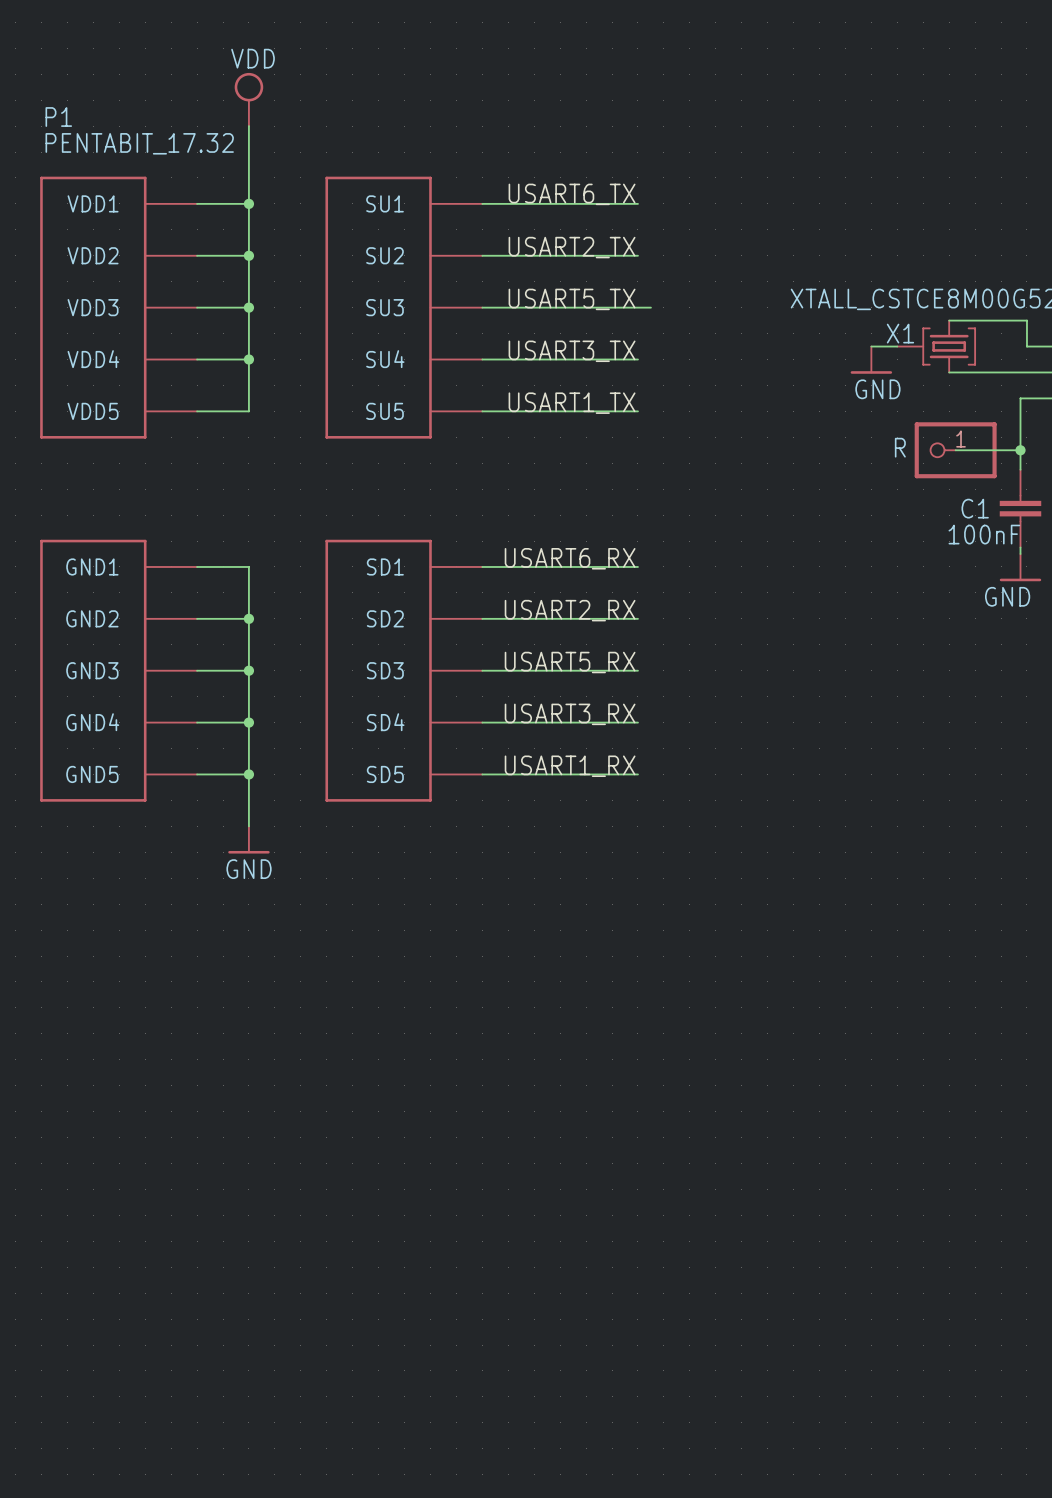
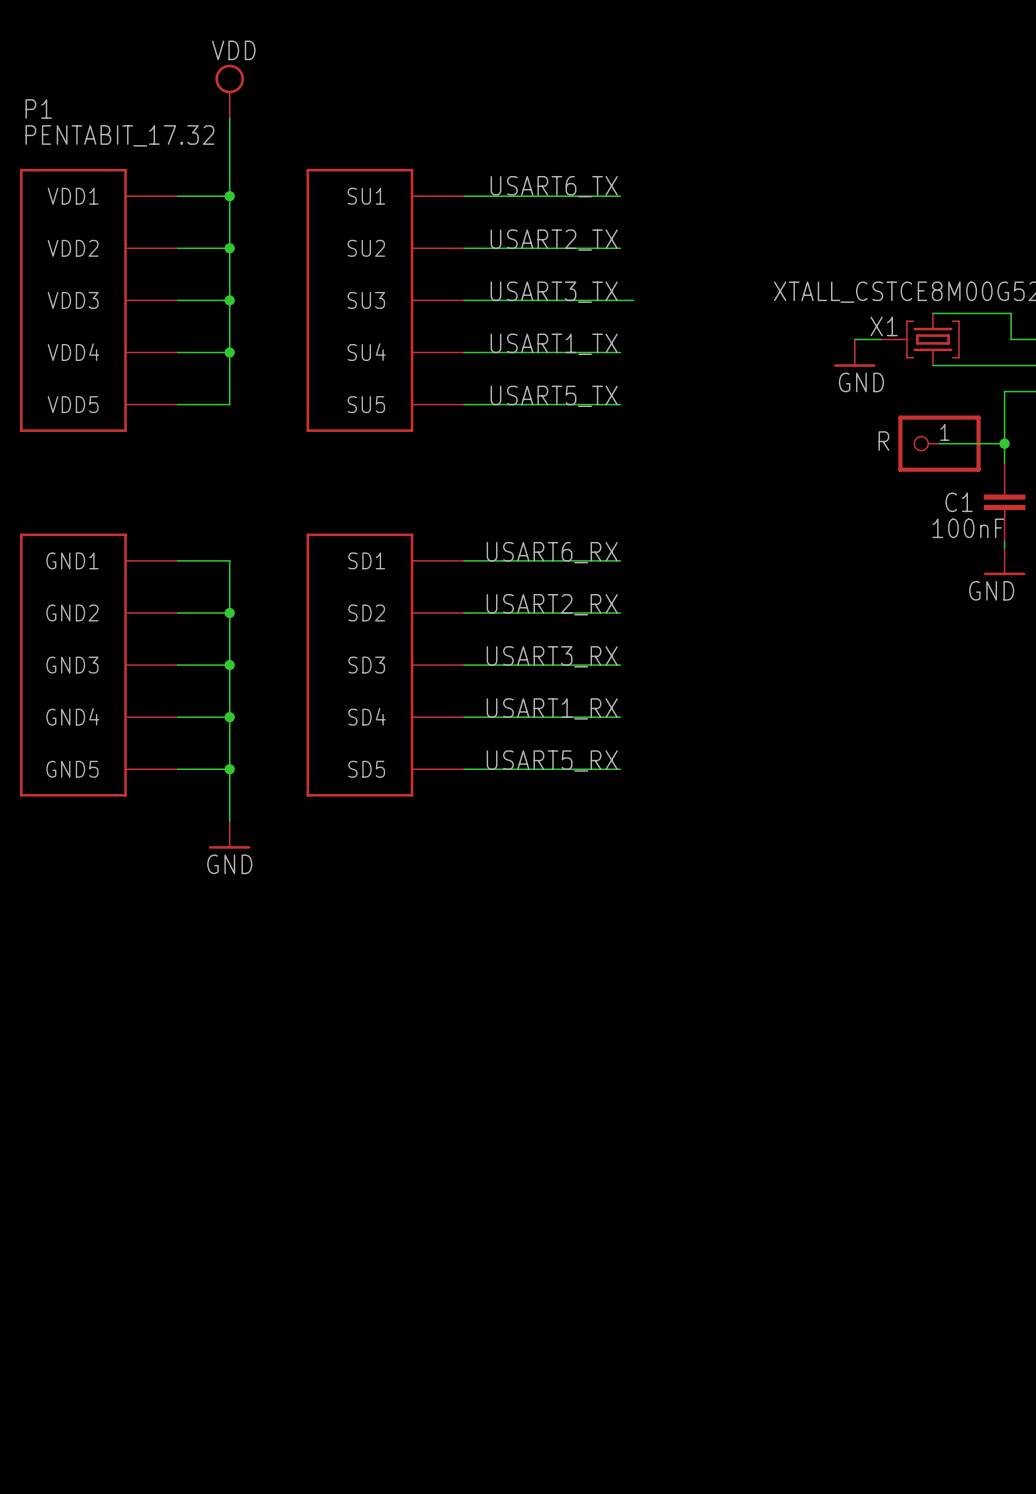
label: USART5_TX (572, 299) -> USART3_TX (554, 292)
label: USART3_TX (572, 351) -> USART1_TX (554, 344)
label: USART1_TX (572, 403) -> USART5_TX (554, 396)
label: USART5_RX (570, 662) -> USART3_RX (552, 656)
label: USART3_RX (570, 714) -> USART1_RX (552, 708)
label: USART1_RX (570, 766) -> USART5_RX (552, 761)

